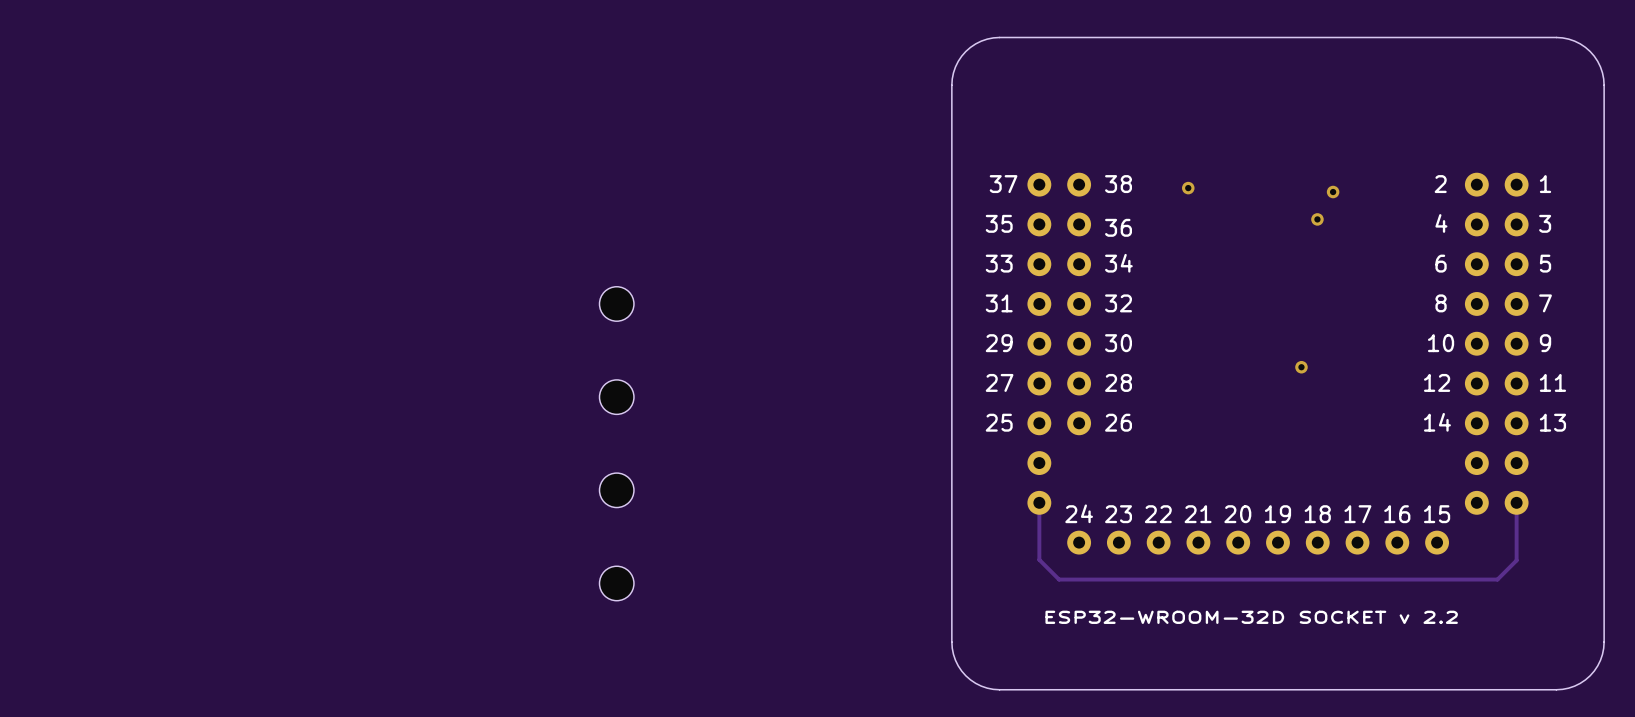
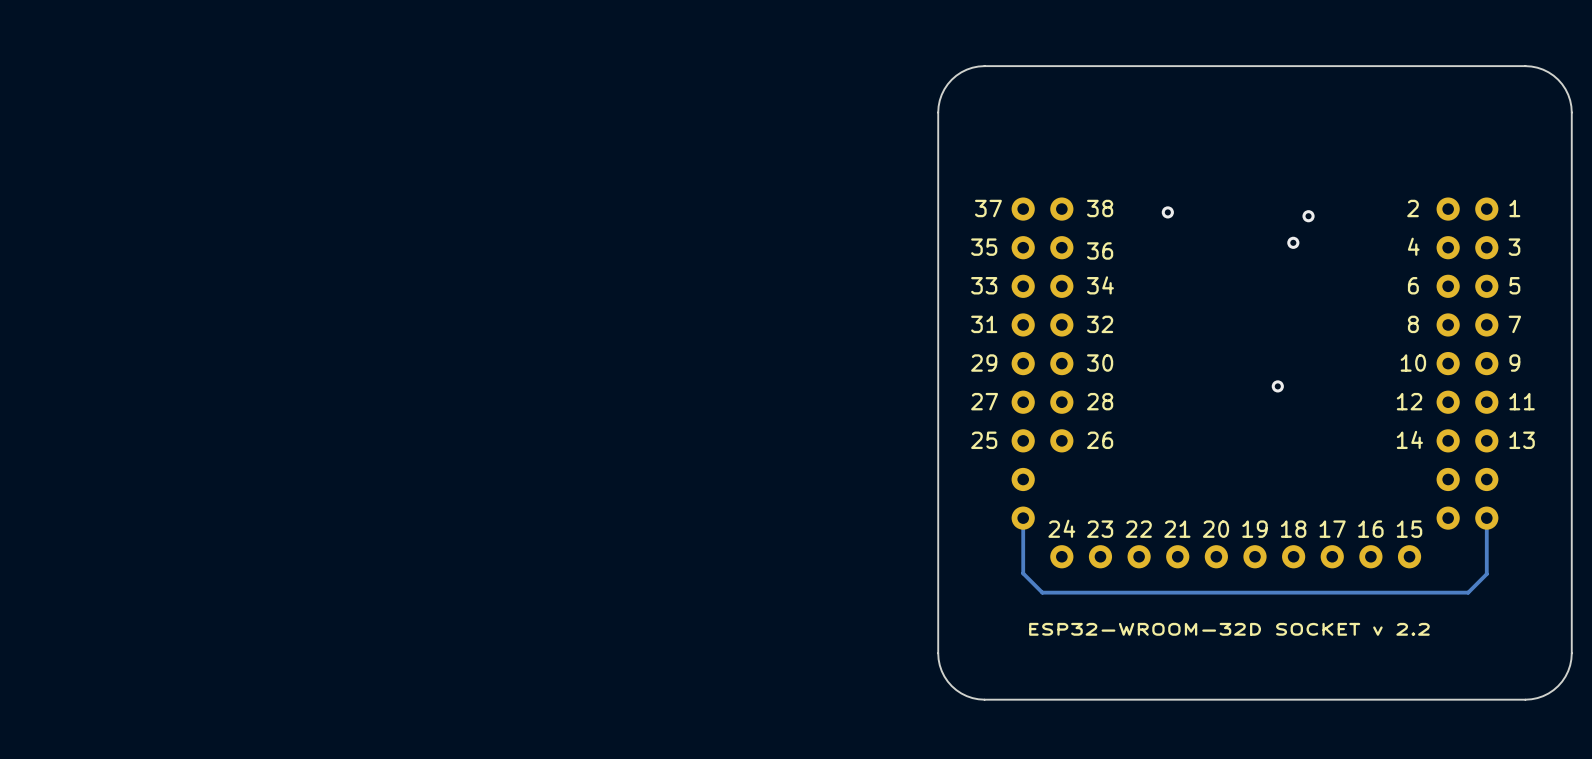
part: (616, 303) -> none
part: (616, 397) -> none
part: (616, 490) -> none
part: (616, 583) -> none

